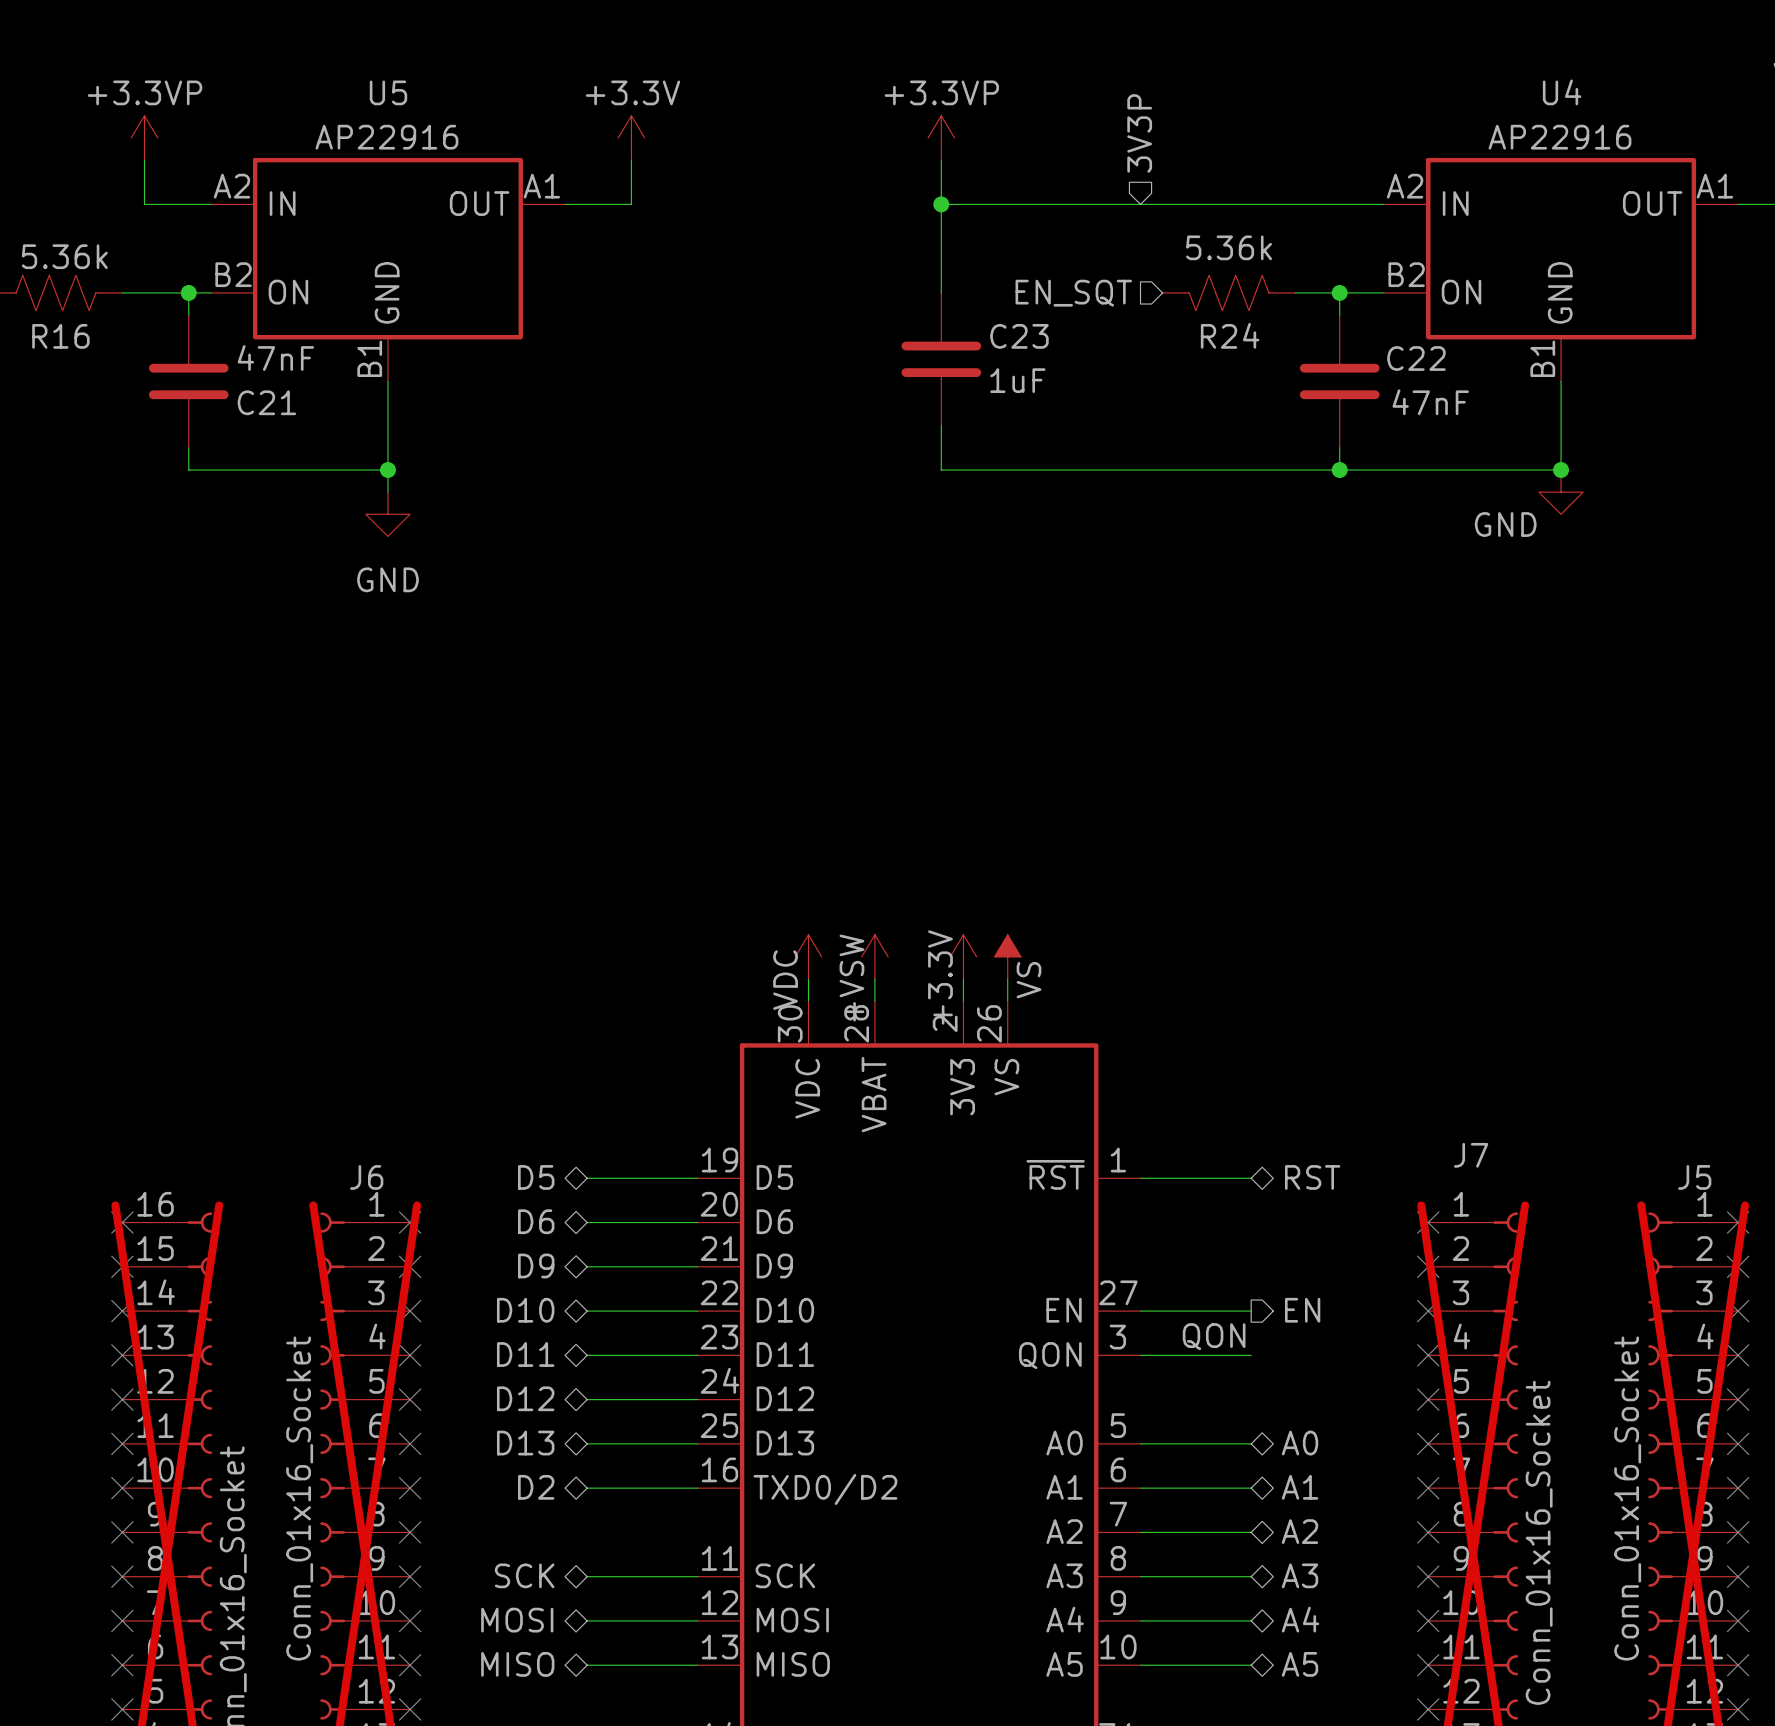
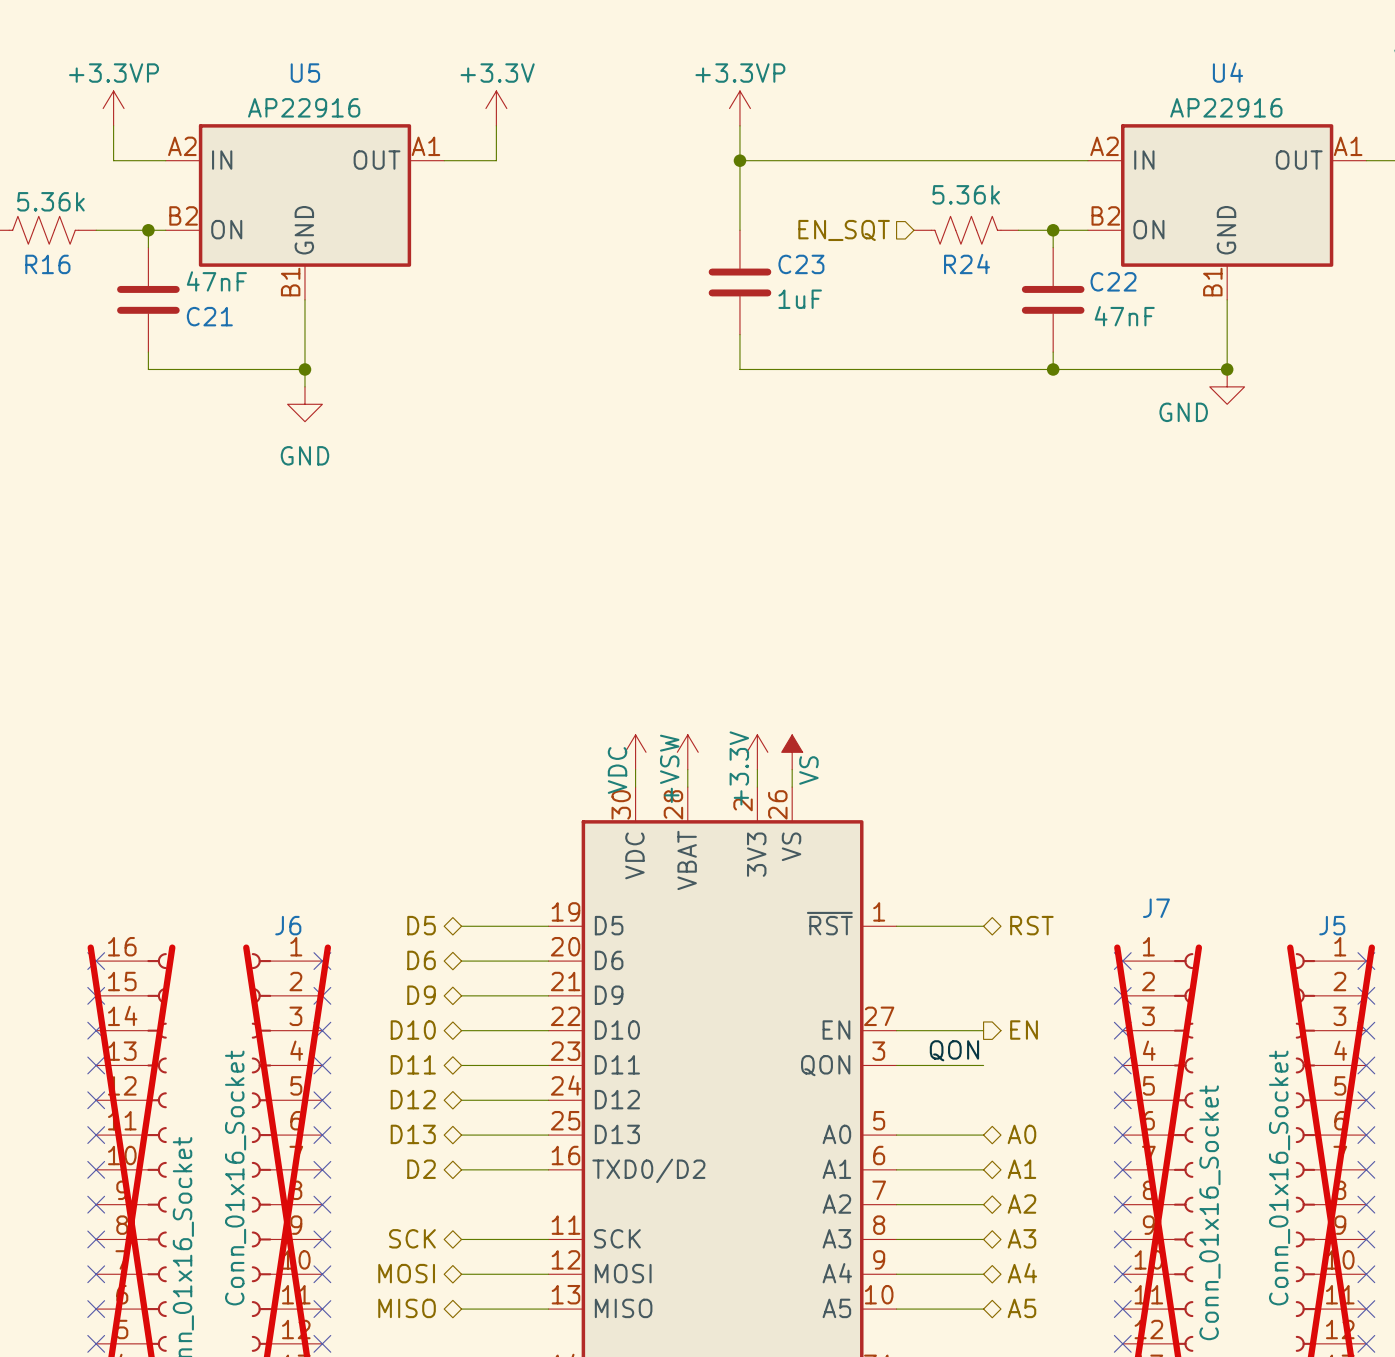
hierarchical label: 3V3P (1139, 133) -> none

